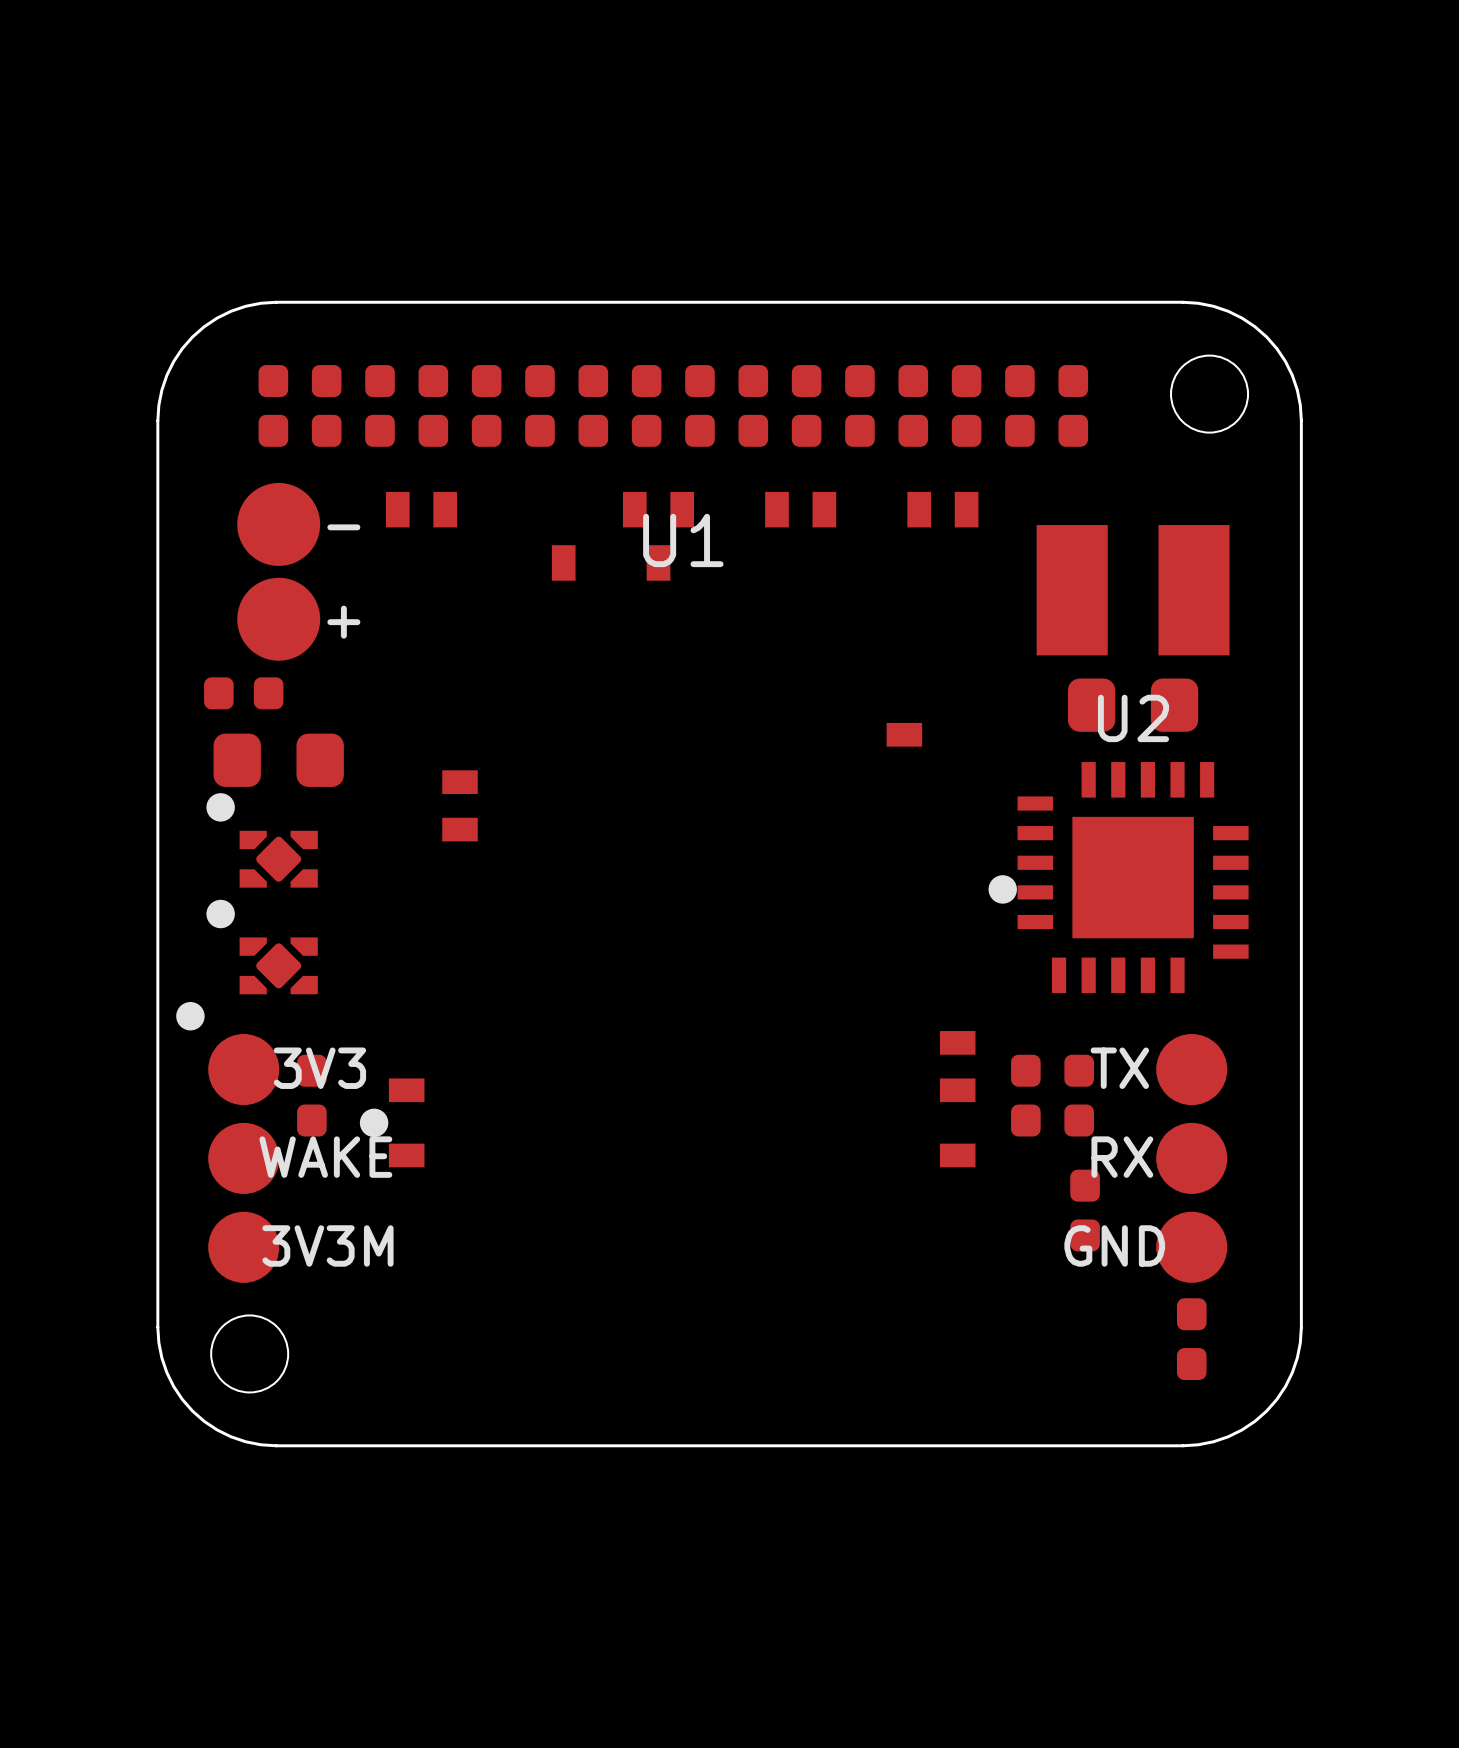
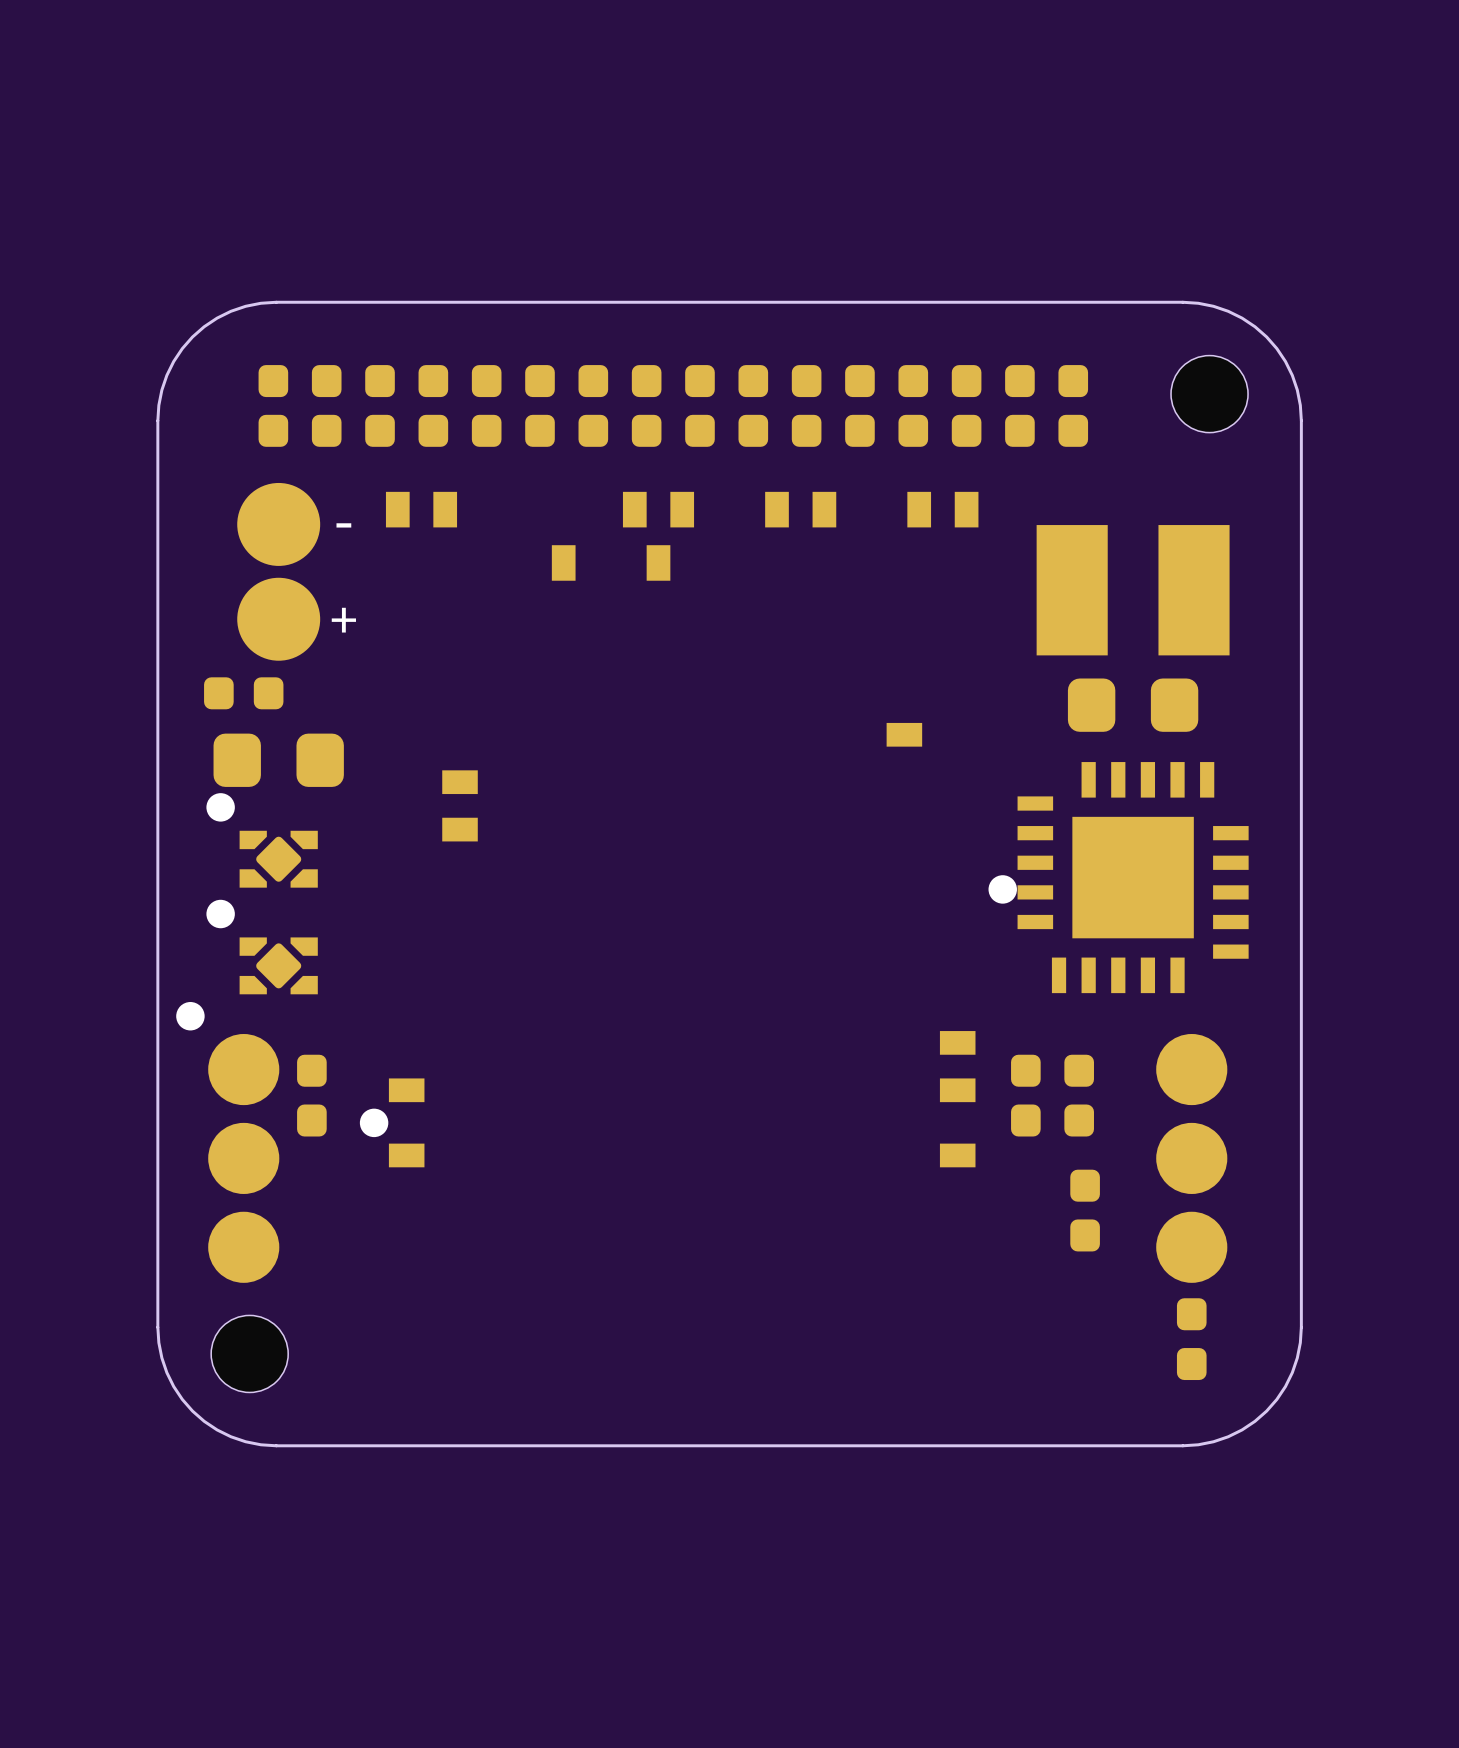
text: U1 (683, 540) -> none
text: U2 (1133, 718) -> none
text: 3V3 (319, 1068) -> none
text: TX (1119, 1068) -> none
text: WAKE (325, 1157) -> none
text: RX (1122, 1157) -> none
text: 3V3M (327, 1245) -> none
text: GND (1114, 1245) -> none

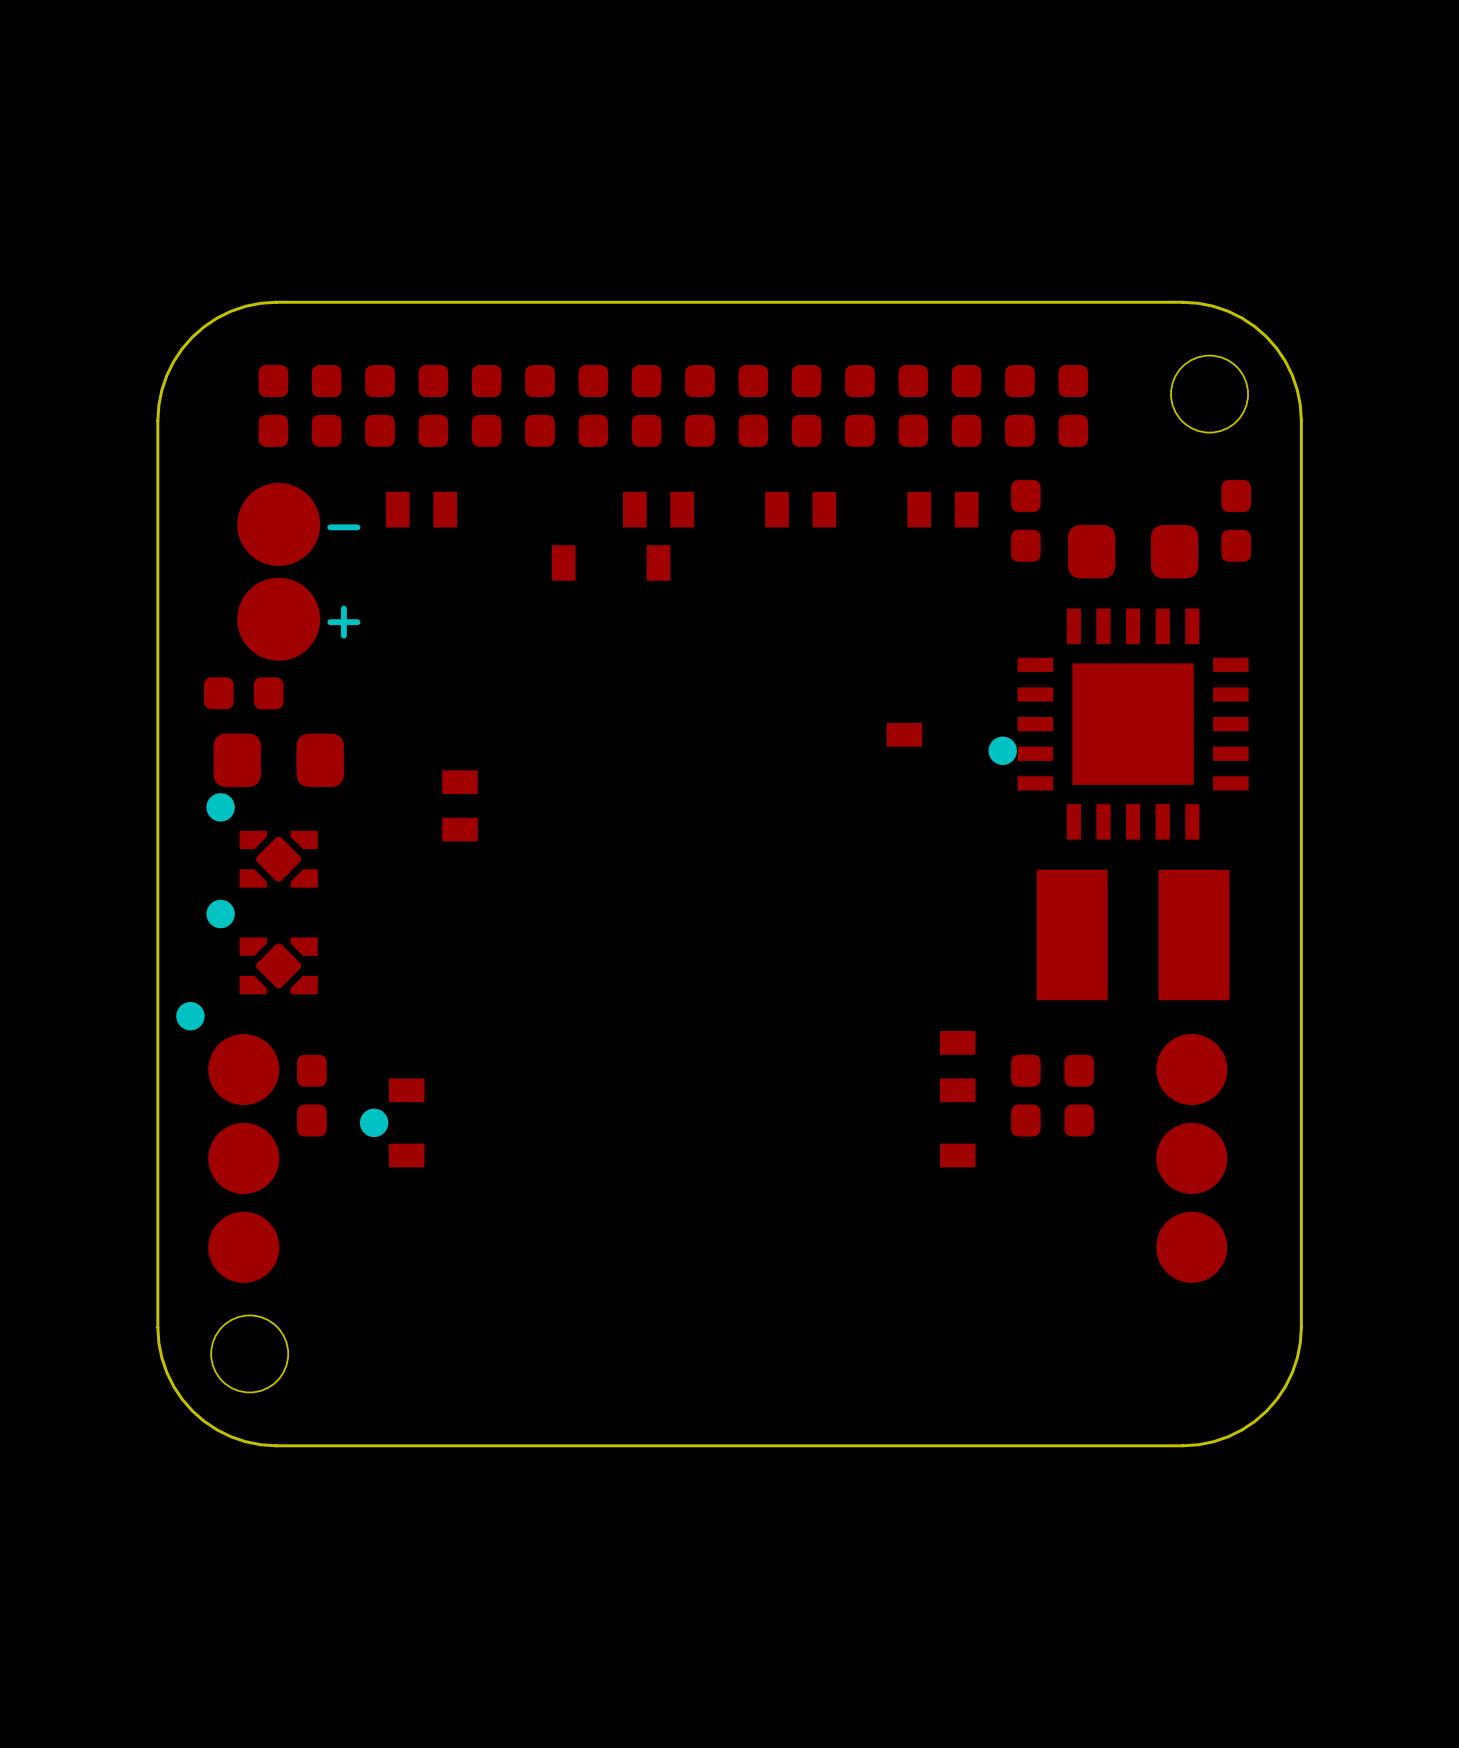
part: none -> (1025, 520)
part: none -> (1236, 520)
part footprint: [1036, 525, 1230, 656] -> [1067, 525, 1199, 579]
part footprint: [1067, 678, 1199, 732] -> [1017, 608, 1249, 840]
part footprint: [1017, 762, 1249, 994] -> [1036, 869, 1230, 1001]
drawing position: (1002, 889) -> (1002, 750)
part: (1085, 1210) -> none
part: (1191, 1339) -> none

